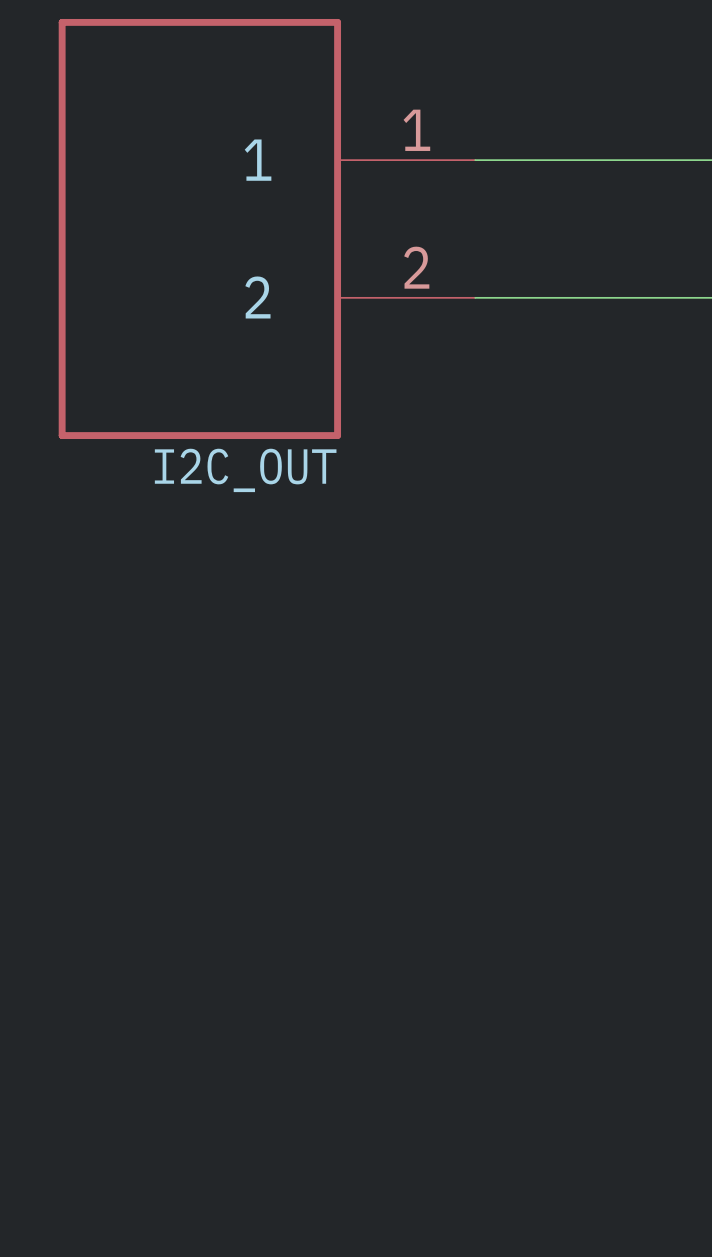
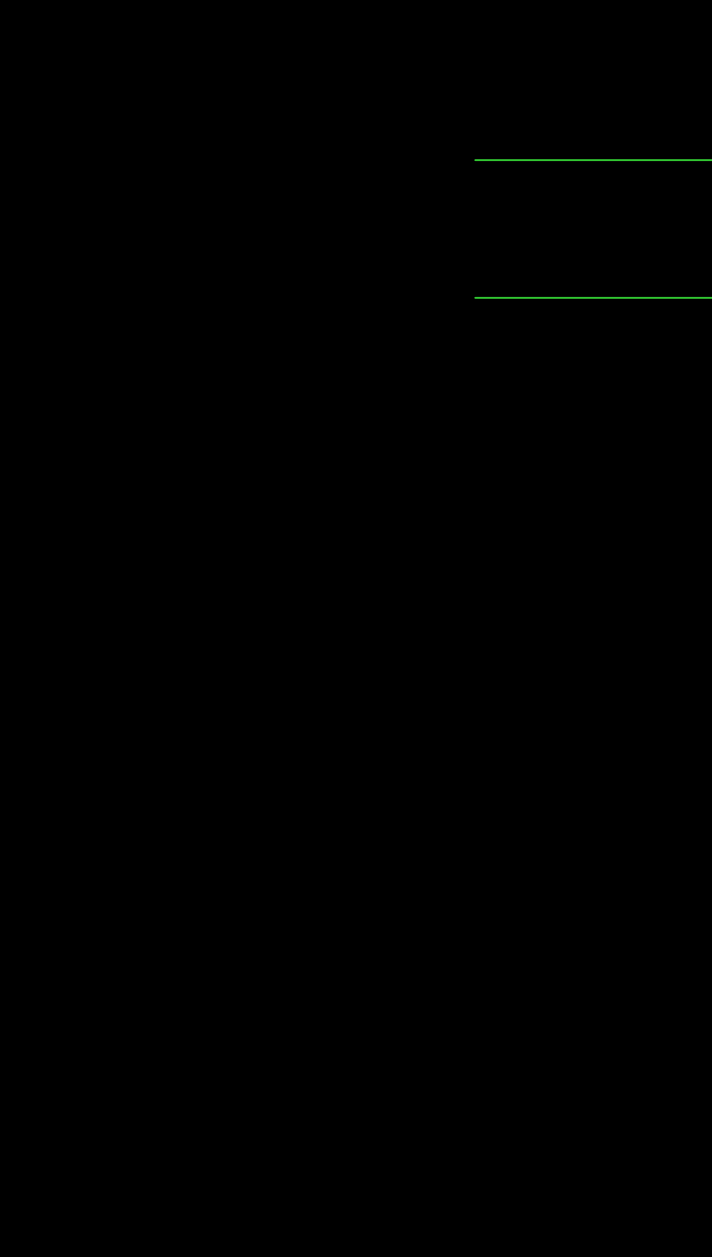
I2C_OUT: (267, 228) -> none

